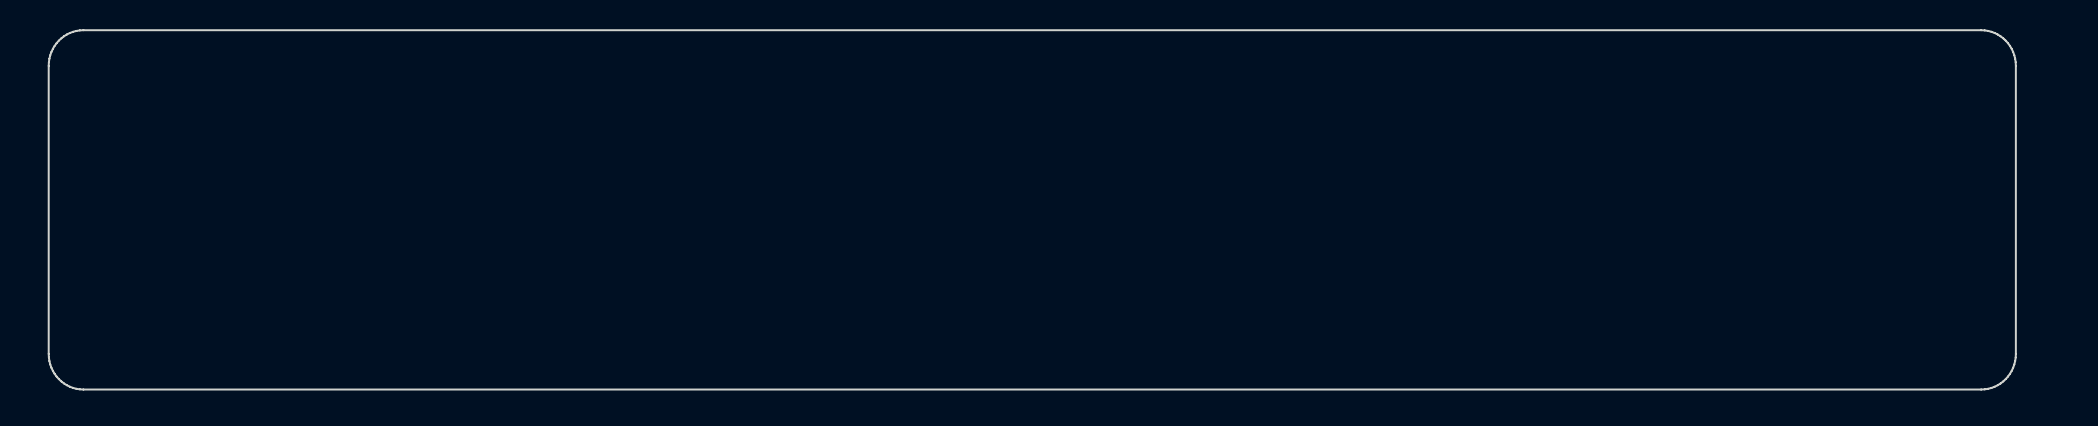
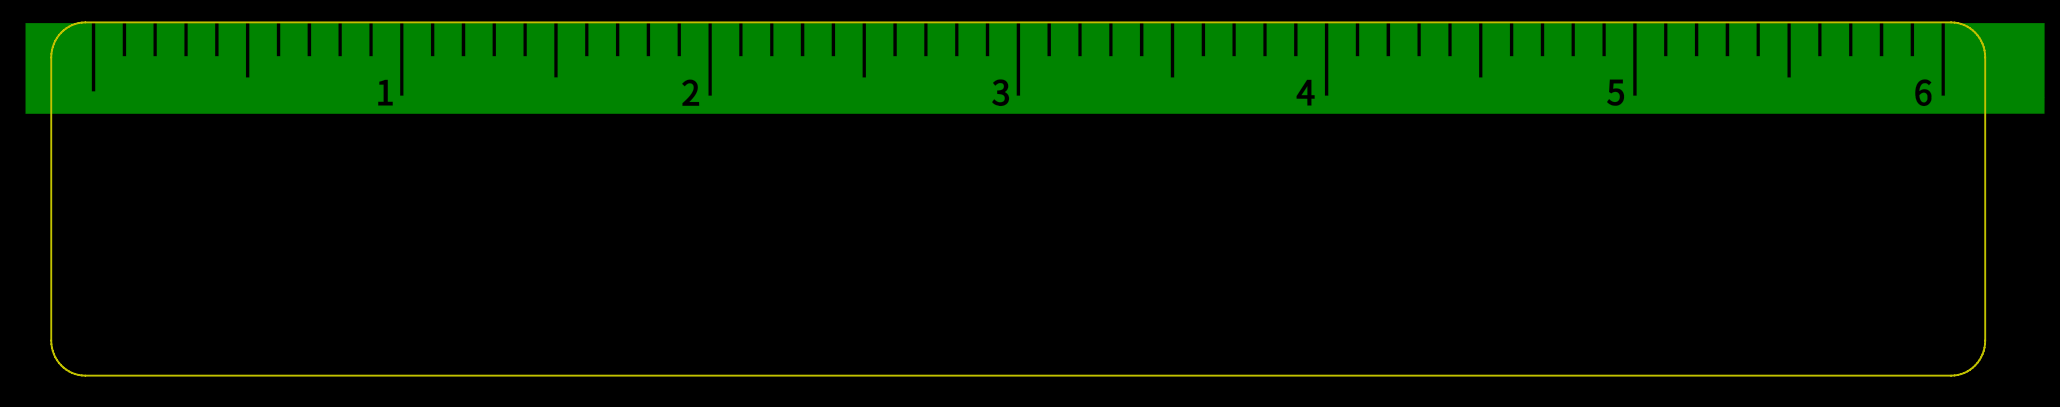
drawing: none -> [25, 23, 2045, 114]

